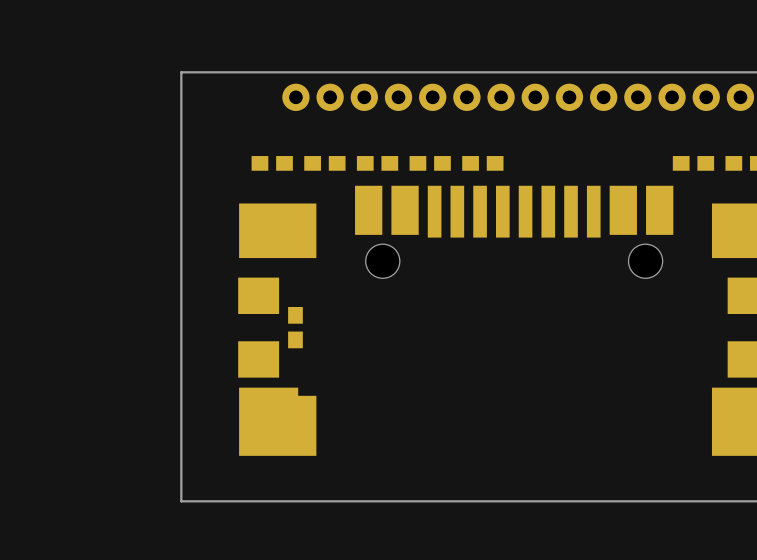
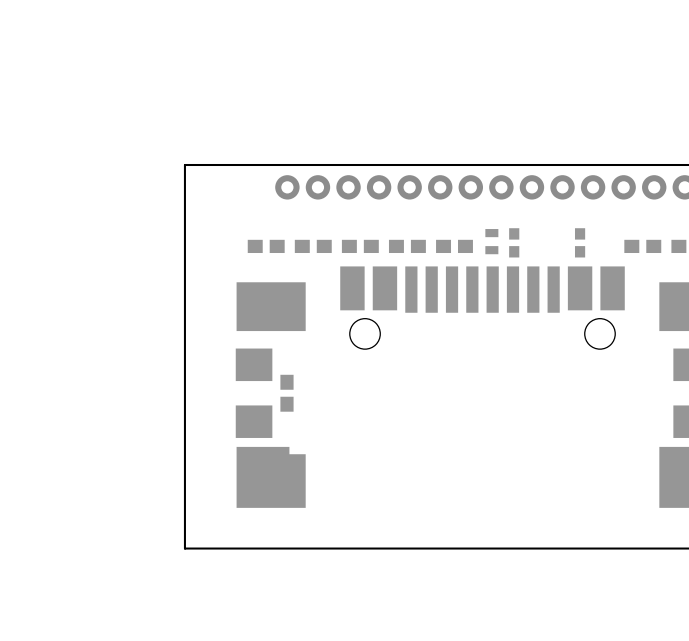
part: none -> (491, 241)
part: none -> (514, 242)
part: none -> (580, 242)

